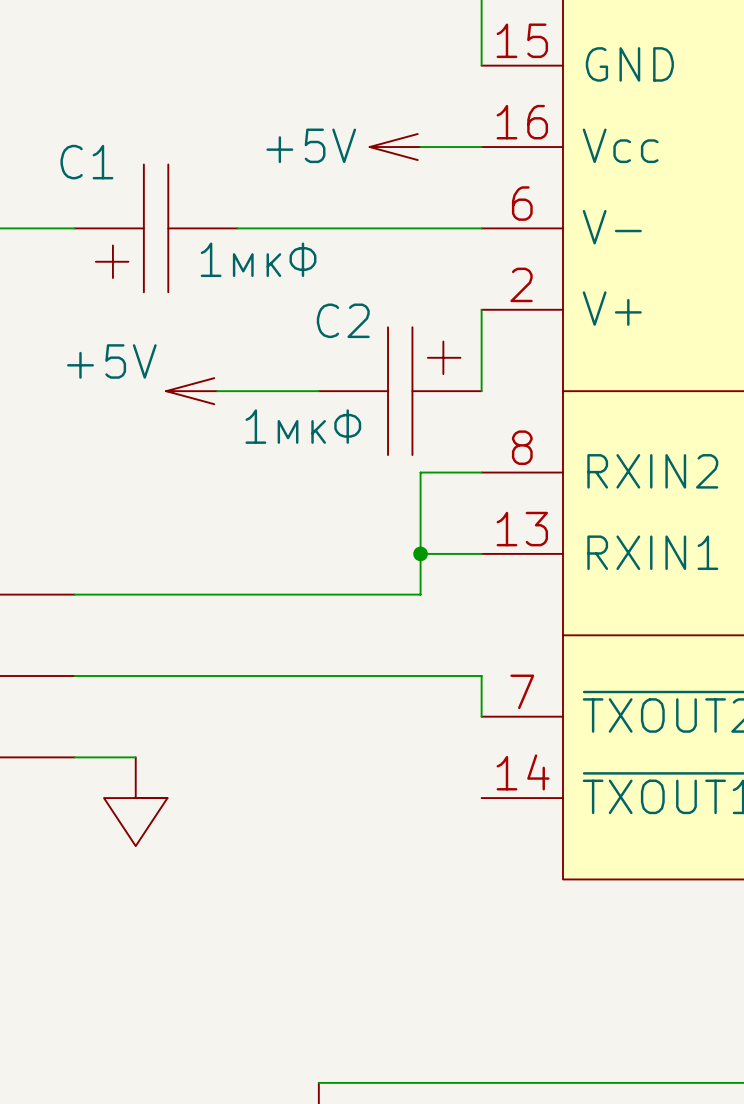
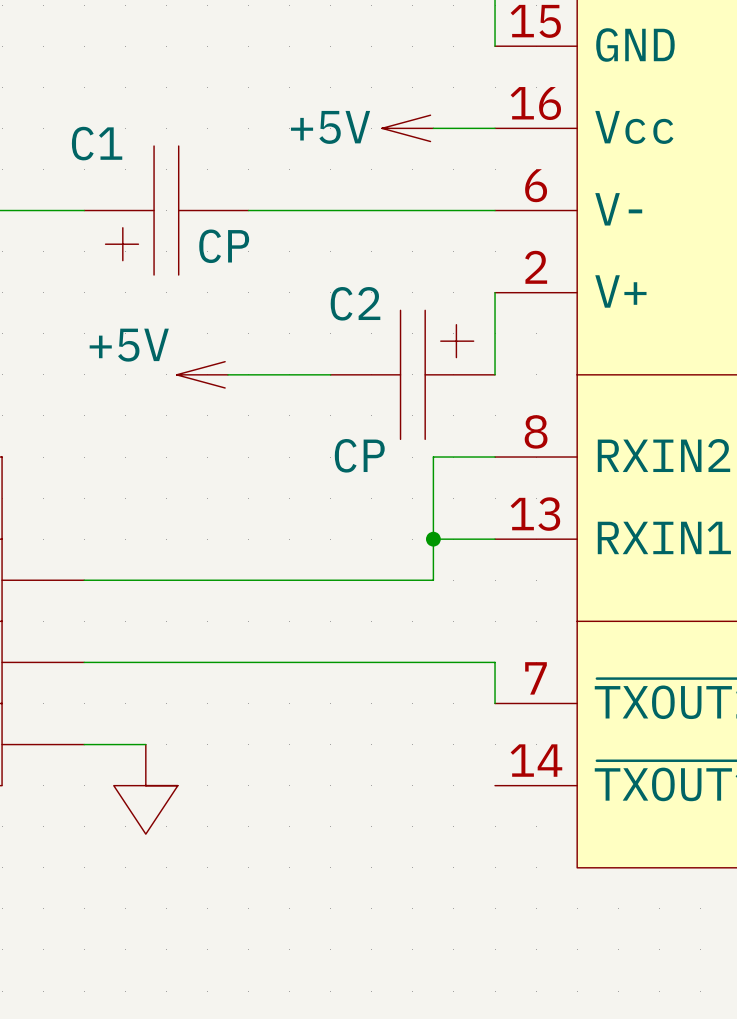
C1 value: 1мкФ (258, 259) -> CP (224, 246)
C2 value: 1мкФ (303, 426) -> CP (359, 455)

